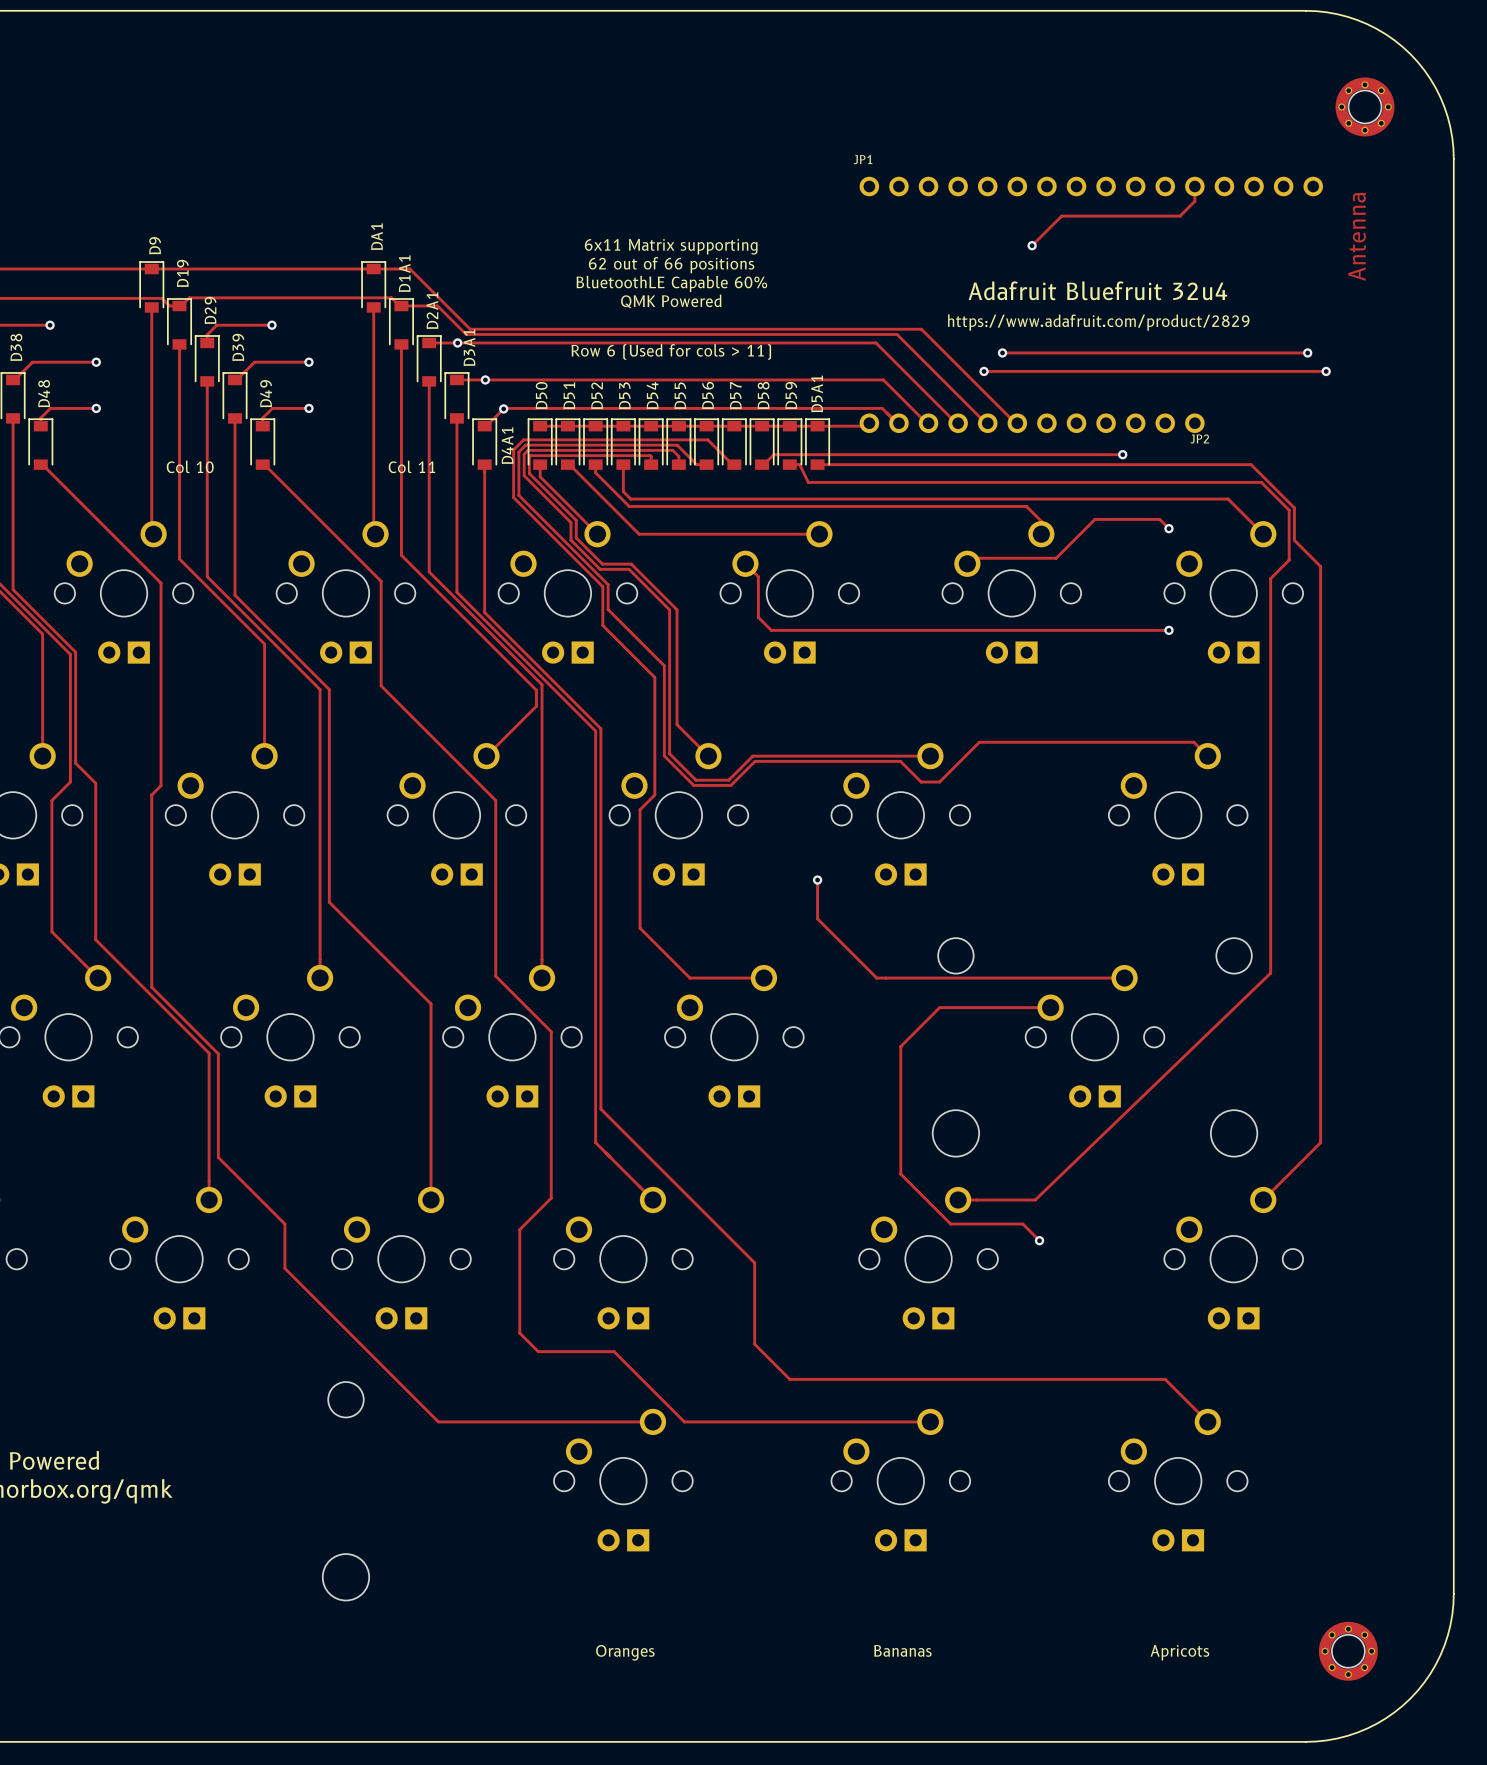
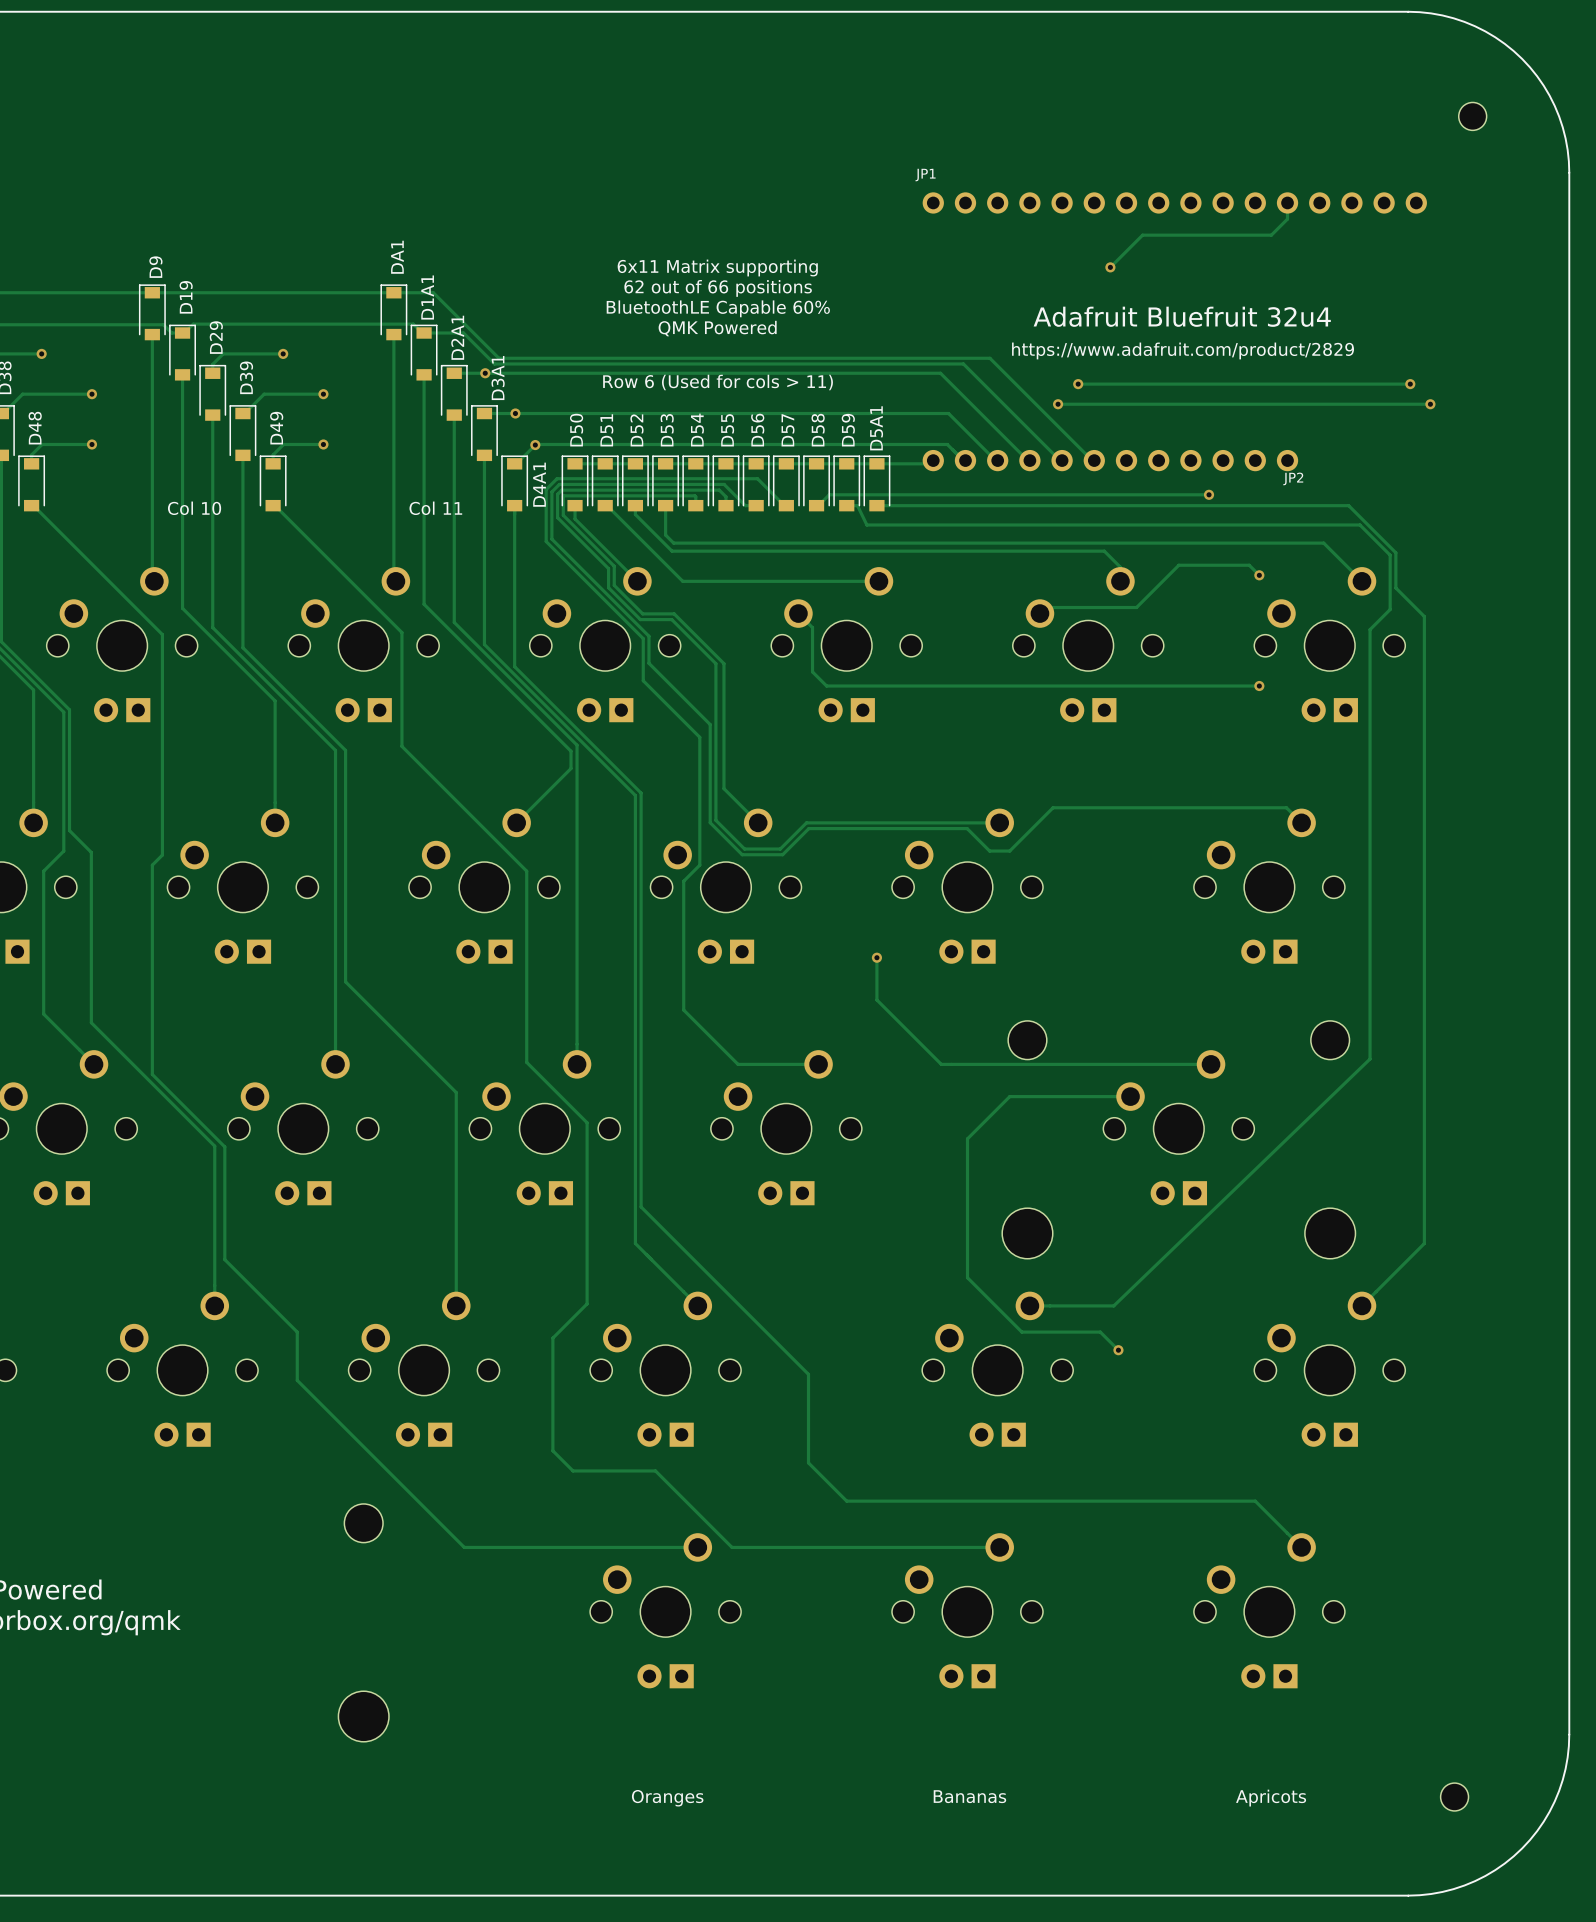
part footprint: [1335, 77, 1395, 137] -> [1458, 102, 1487, 131]
text: Antenna (1357, 236) -> none
part footprint: [1318, 1621, 1378, 1681] -> [1440, 1783, 1469, 1811]

